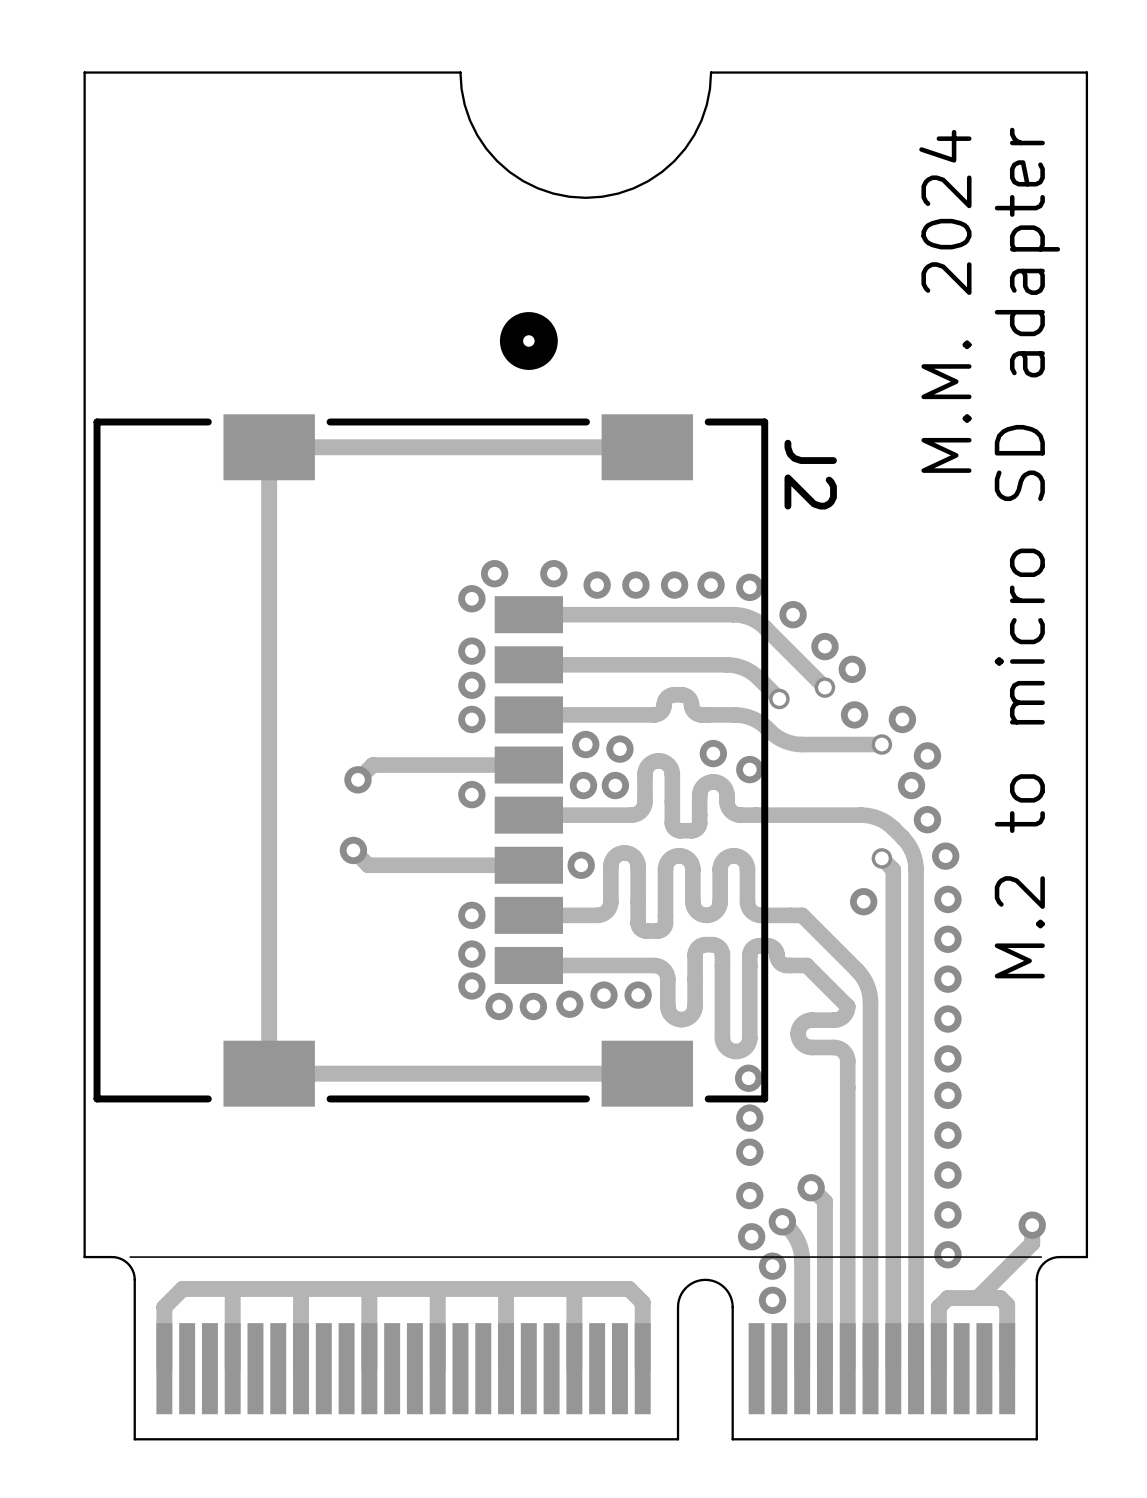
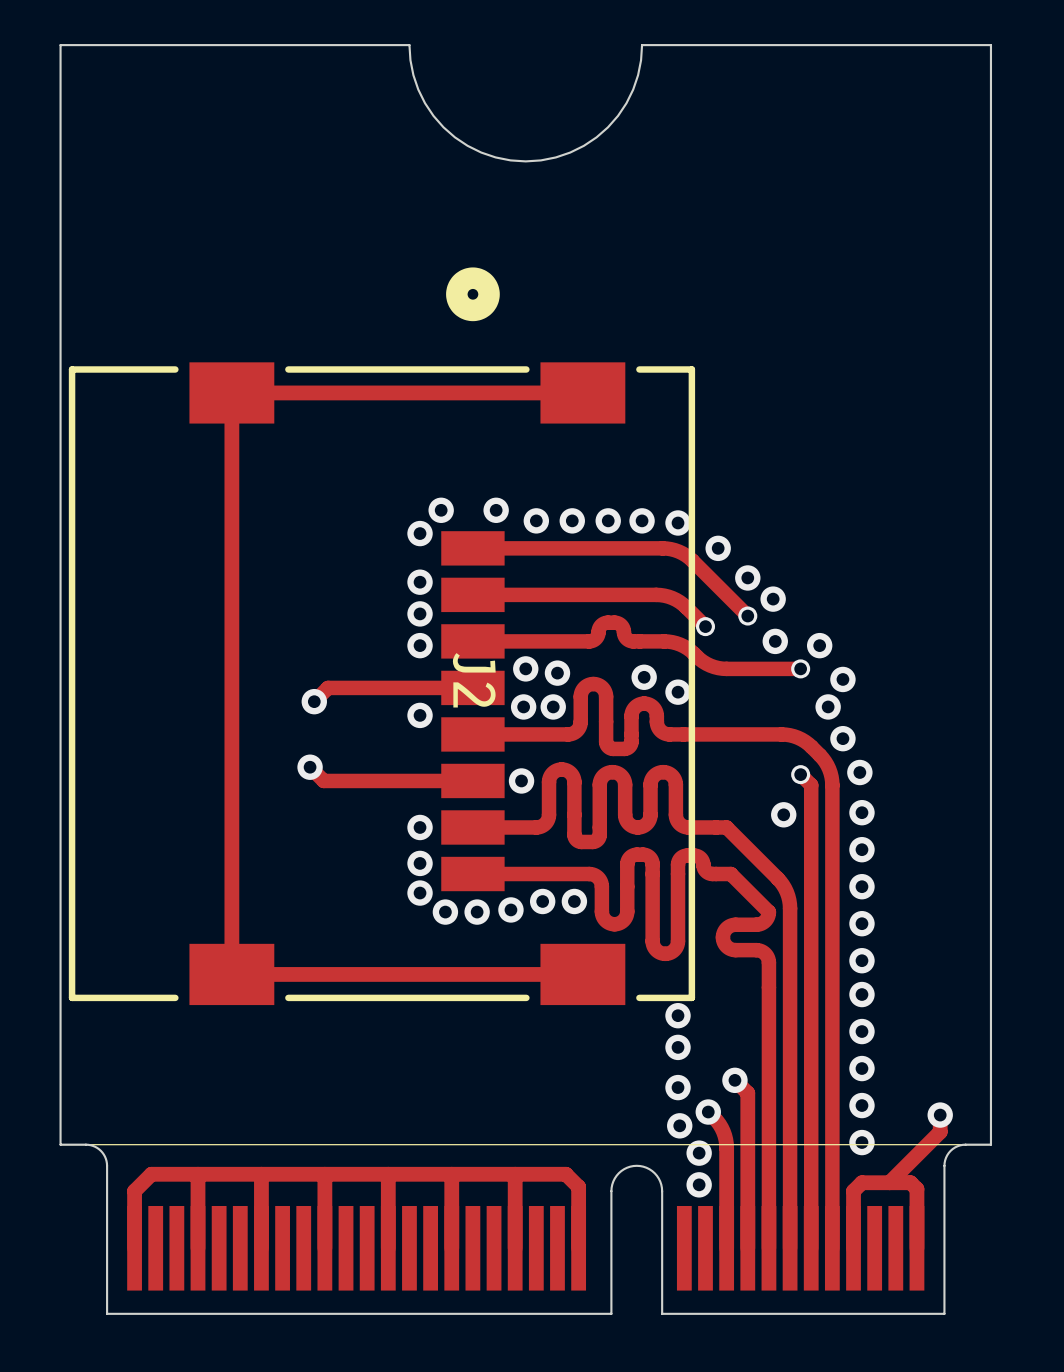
part footprint: [83, 71, 1089, 1441] -> [59, 44, 993, 1315]
text: M.M. 2024 (945, 301) -> none
J2 name position: J2 (810, 474) -> J2 (474, 680)
text: M.2 to micro SD adapter (1027, 553) -> none
via: (748, 1078) -> none

